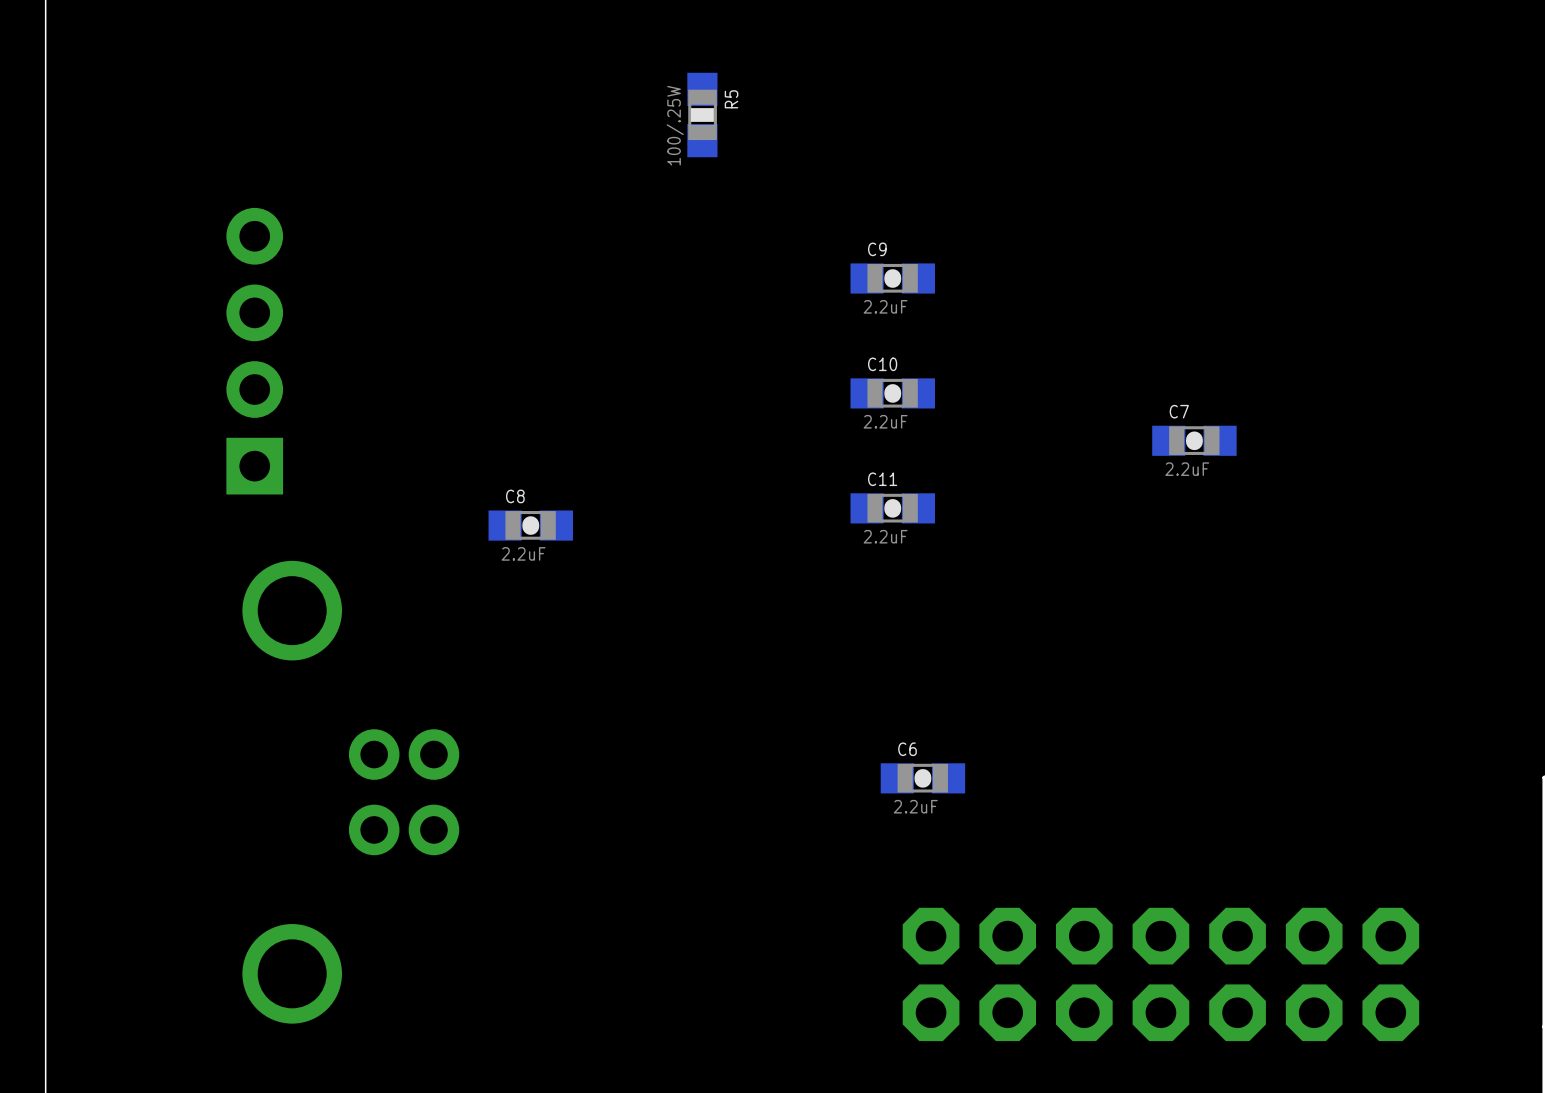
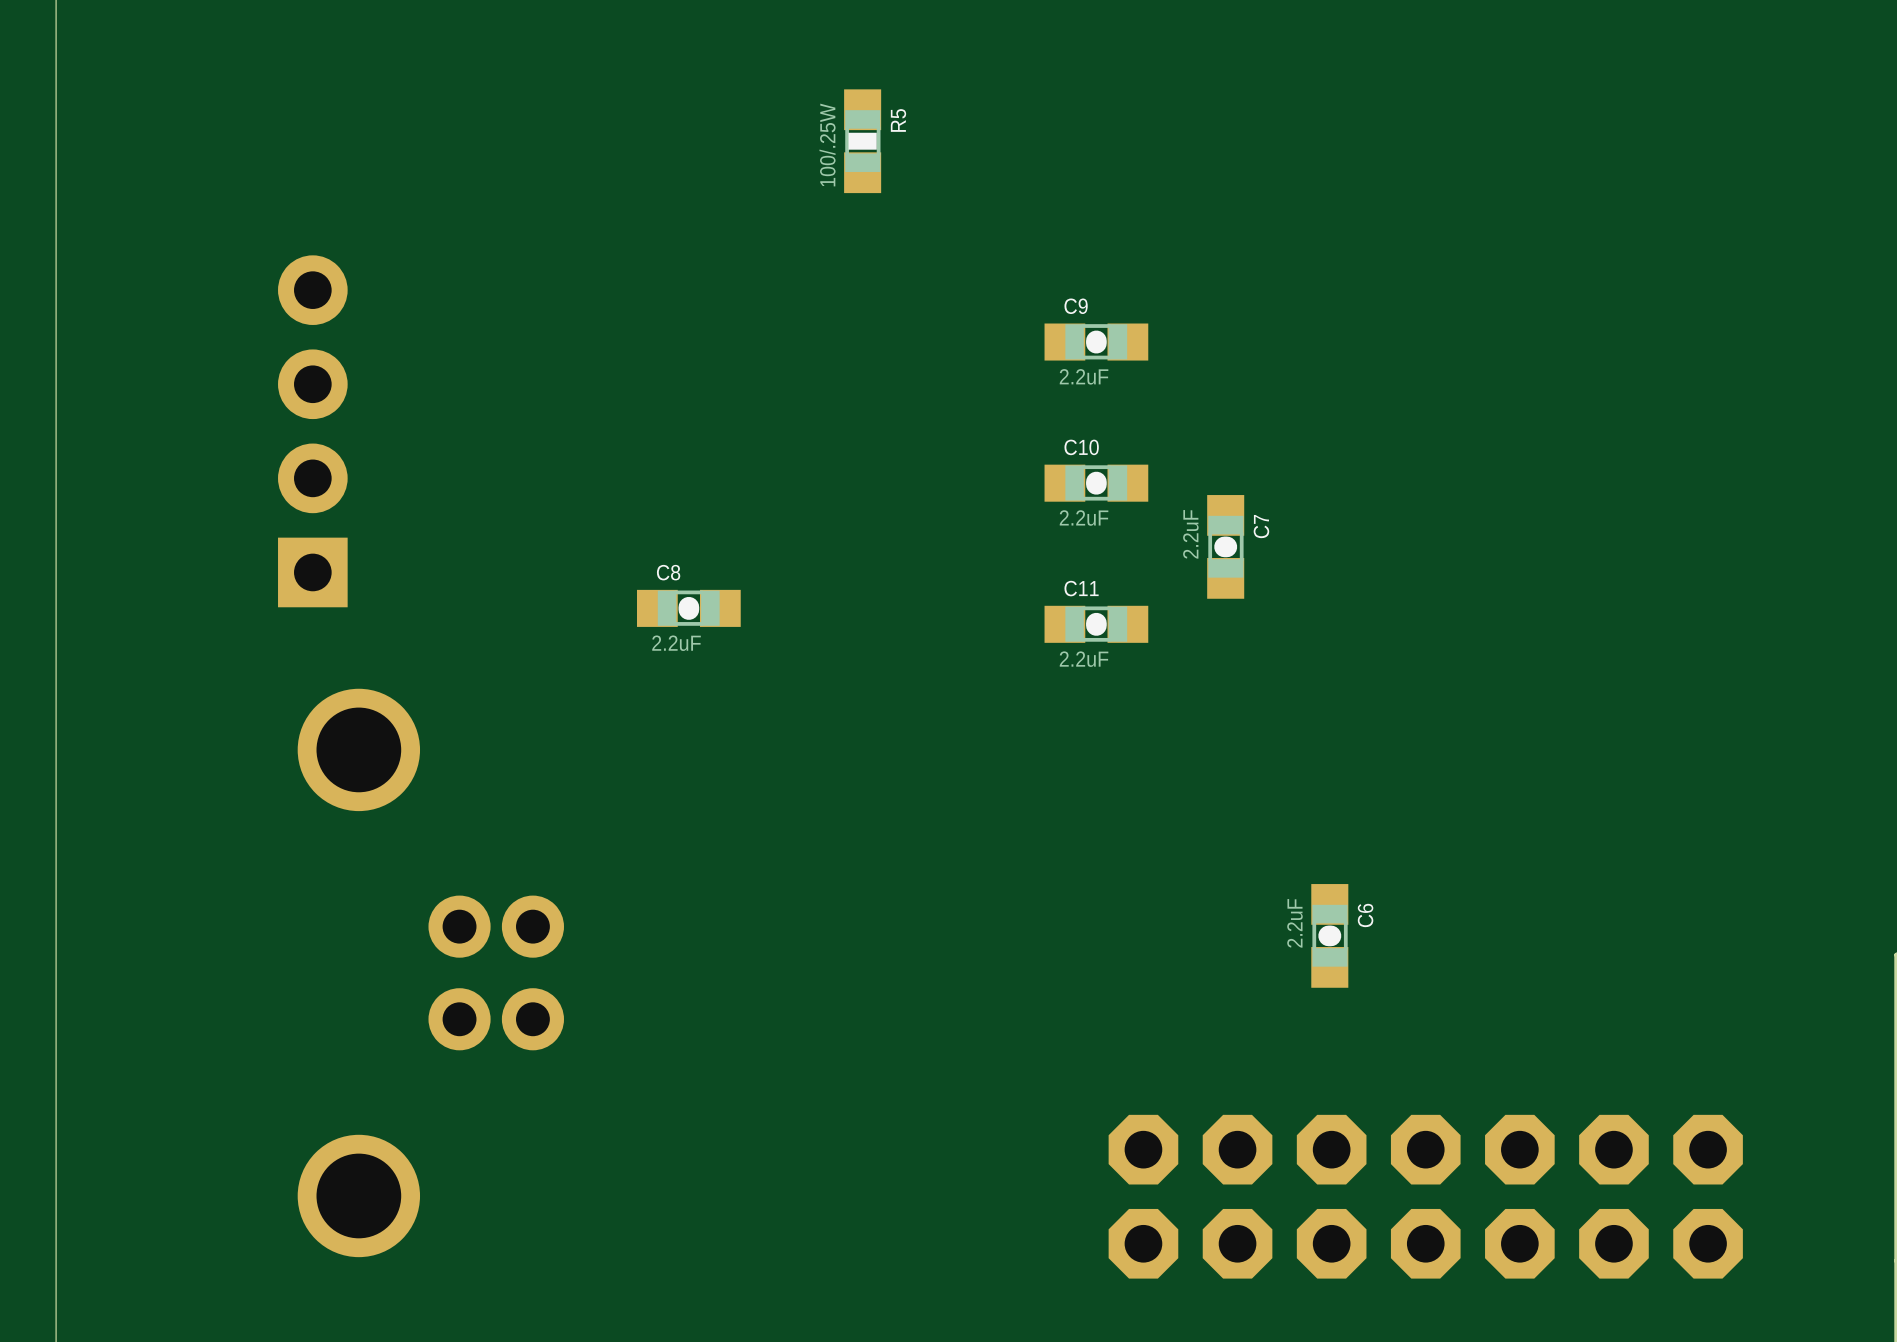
C7 rotation: 0° (1194, 440) -> 90° clockwise (1225, 546)
C7 position: (1194, 440) -> (1225, 546)
C8 position: (530, 525) -> (688, 608)
C6 rotation: 0° (922, 778) -> 90° clockwise (1329, 935)
C6 position: (922, 778) -> (1329, 935)

